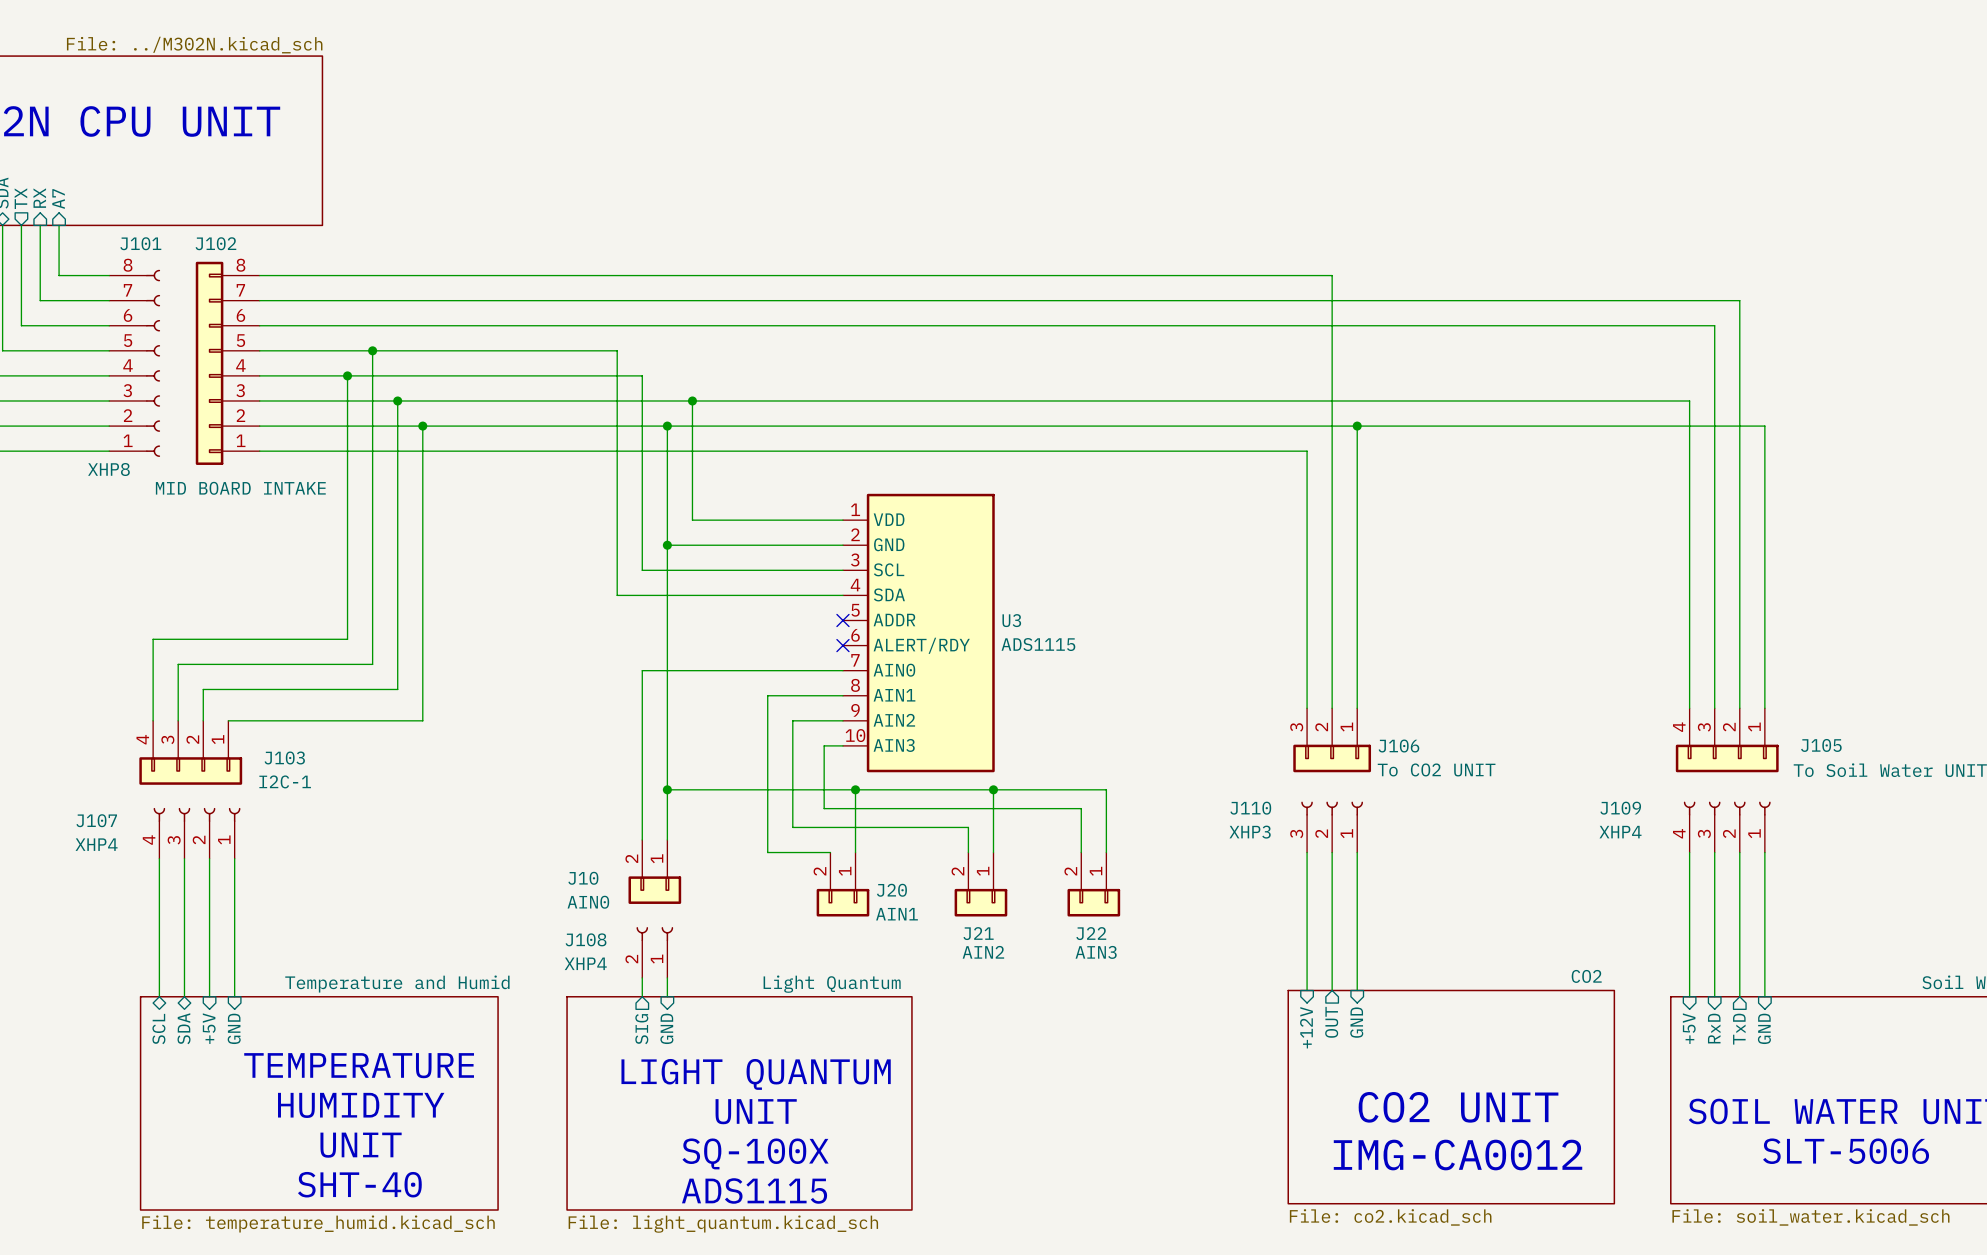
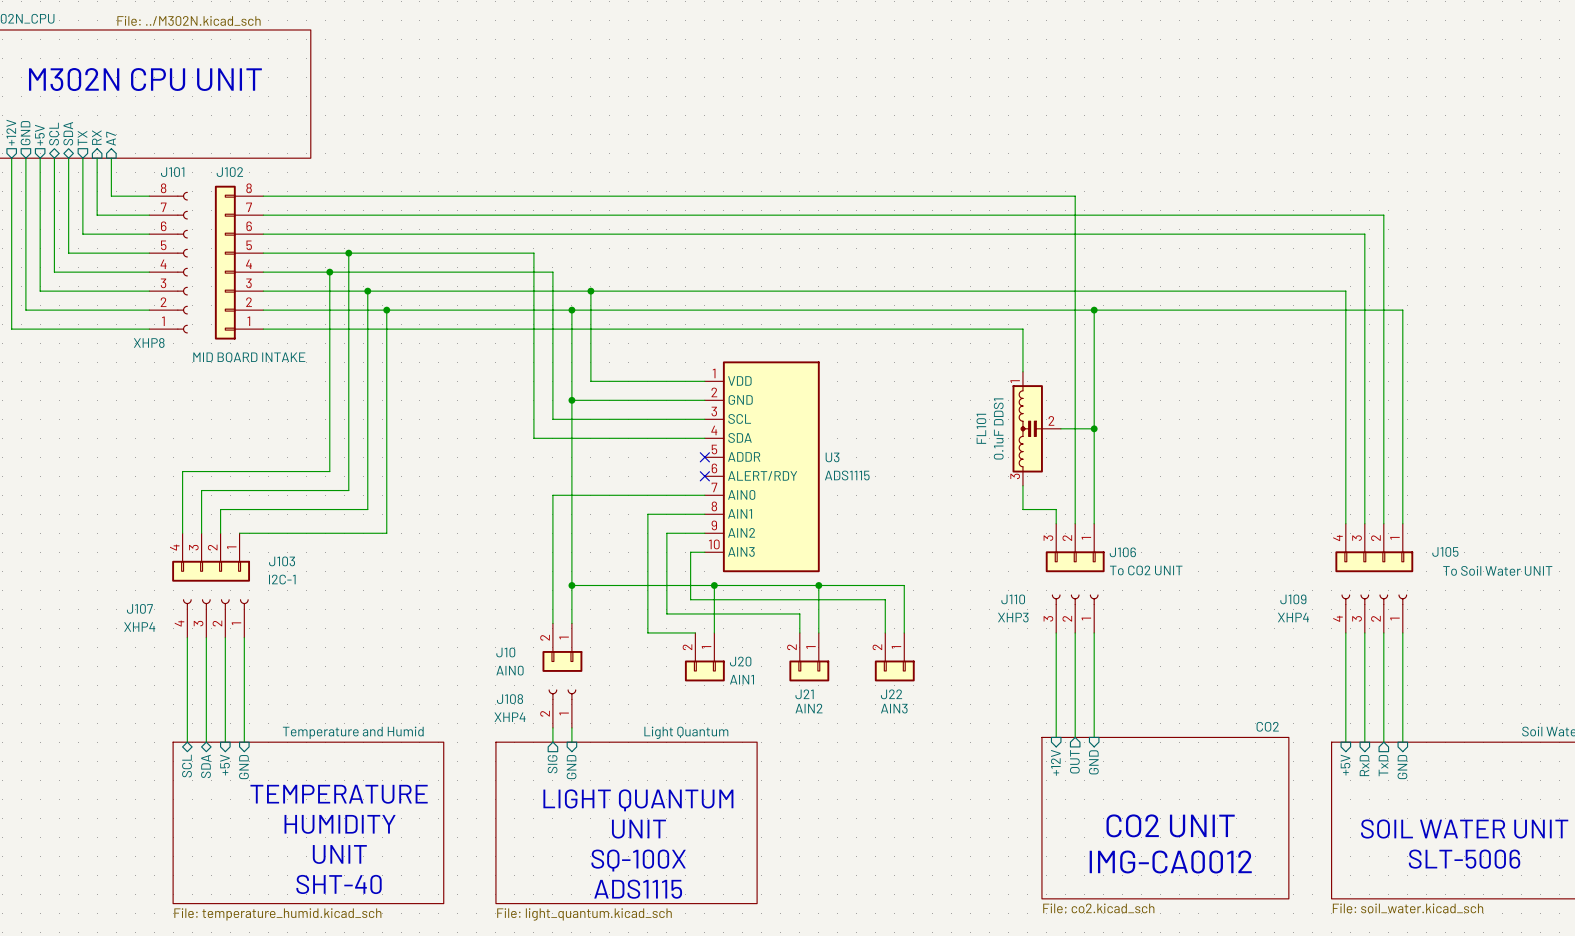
wire: (1263, 451) (1307, 451) (1307, 689) -> (1022, 329) (1022, 371)
FL101: none -> 0.1uF DDS1 (1036, 428)
wire: none -> (1060, 428) (1094, 428)
junction: none -> (1094, 428)
wire: none -> (1022, 485) (1022, 509) (1056, 509)

